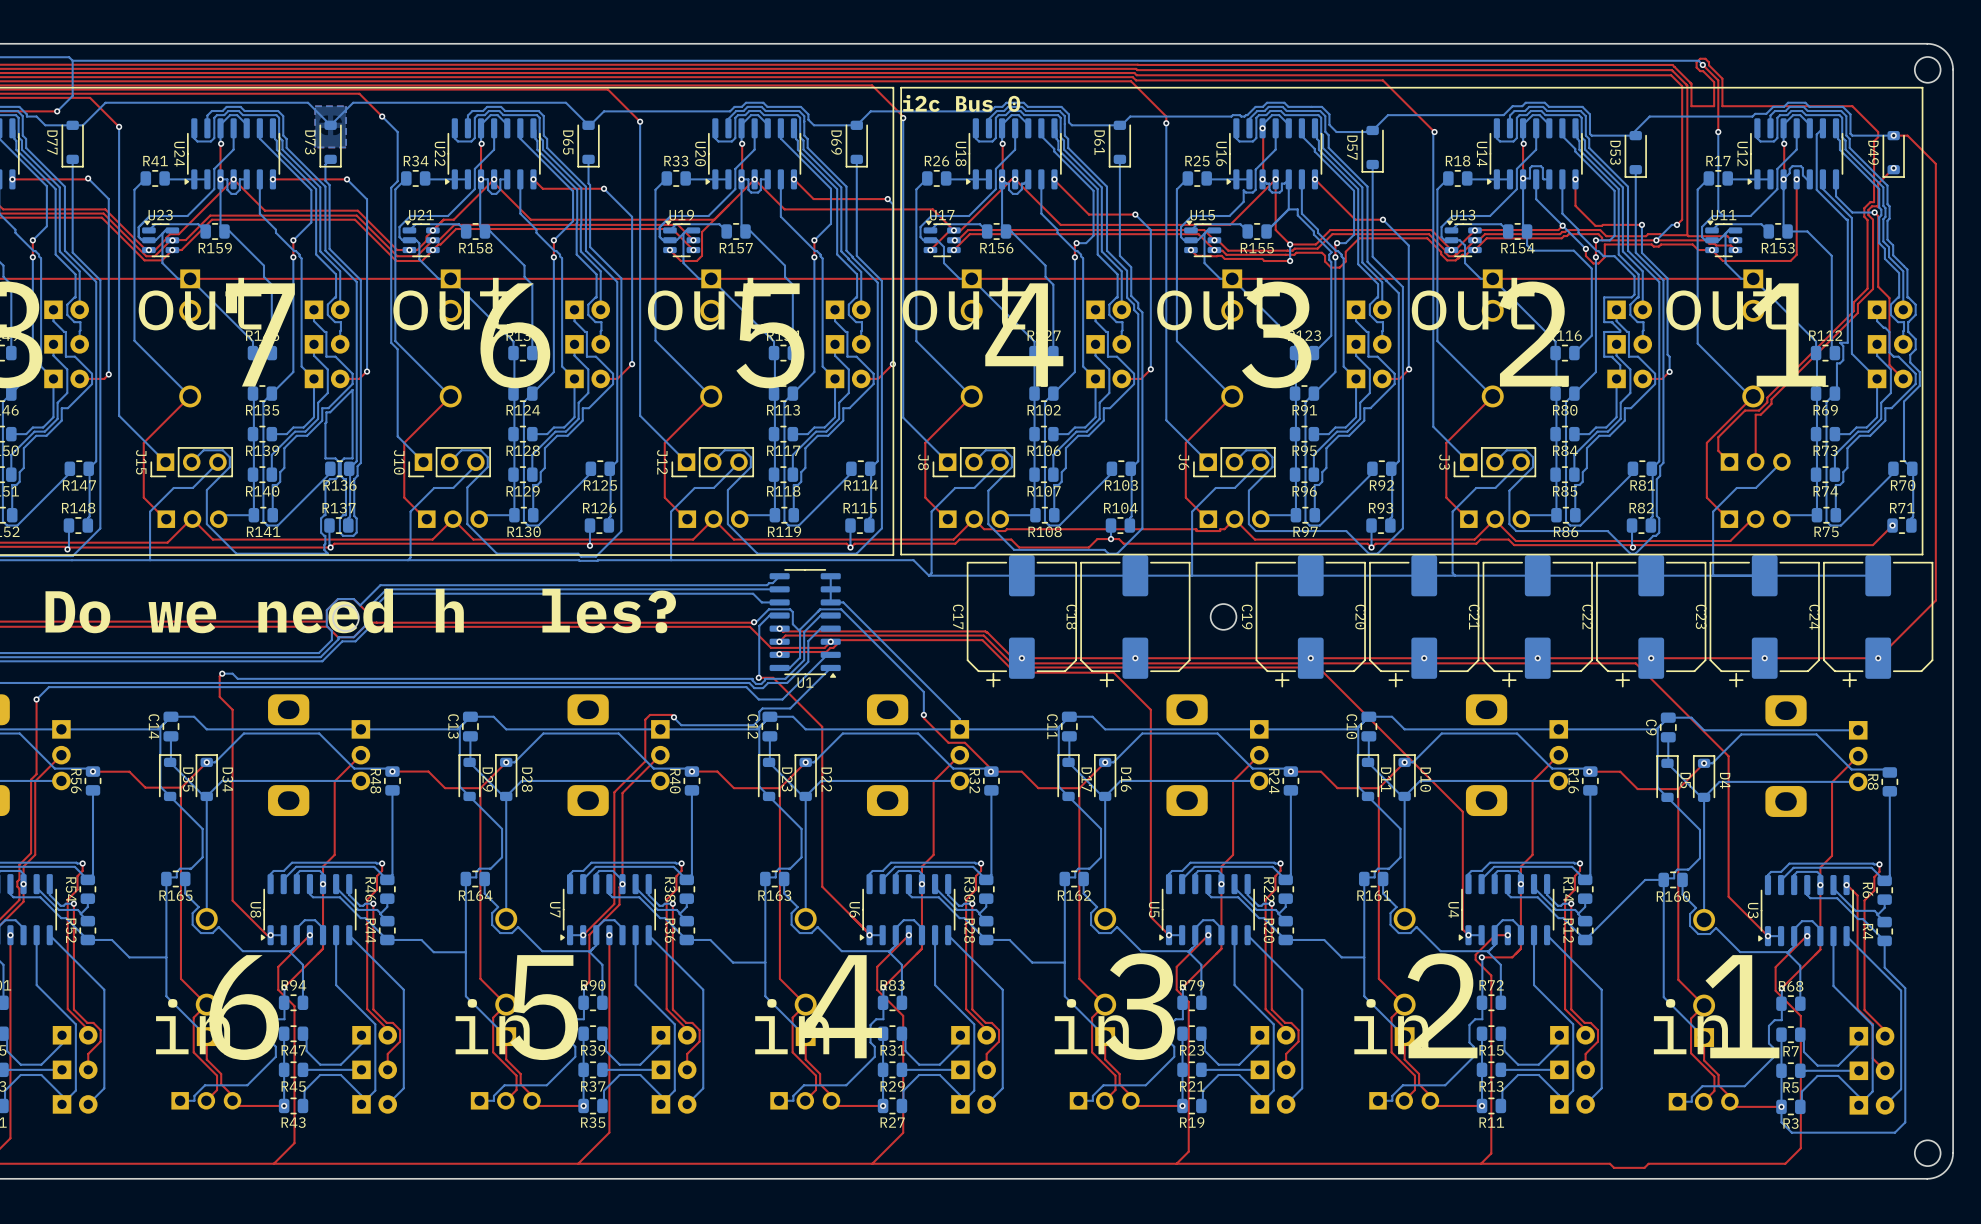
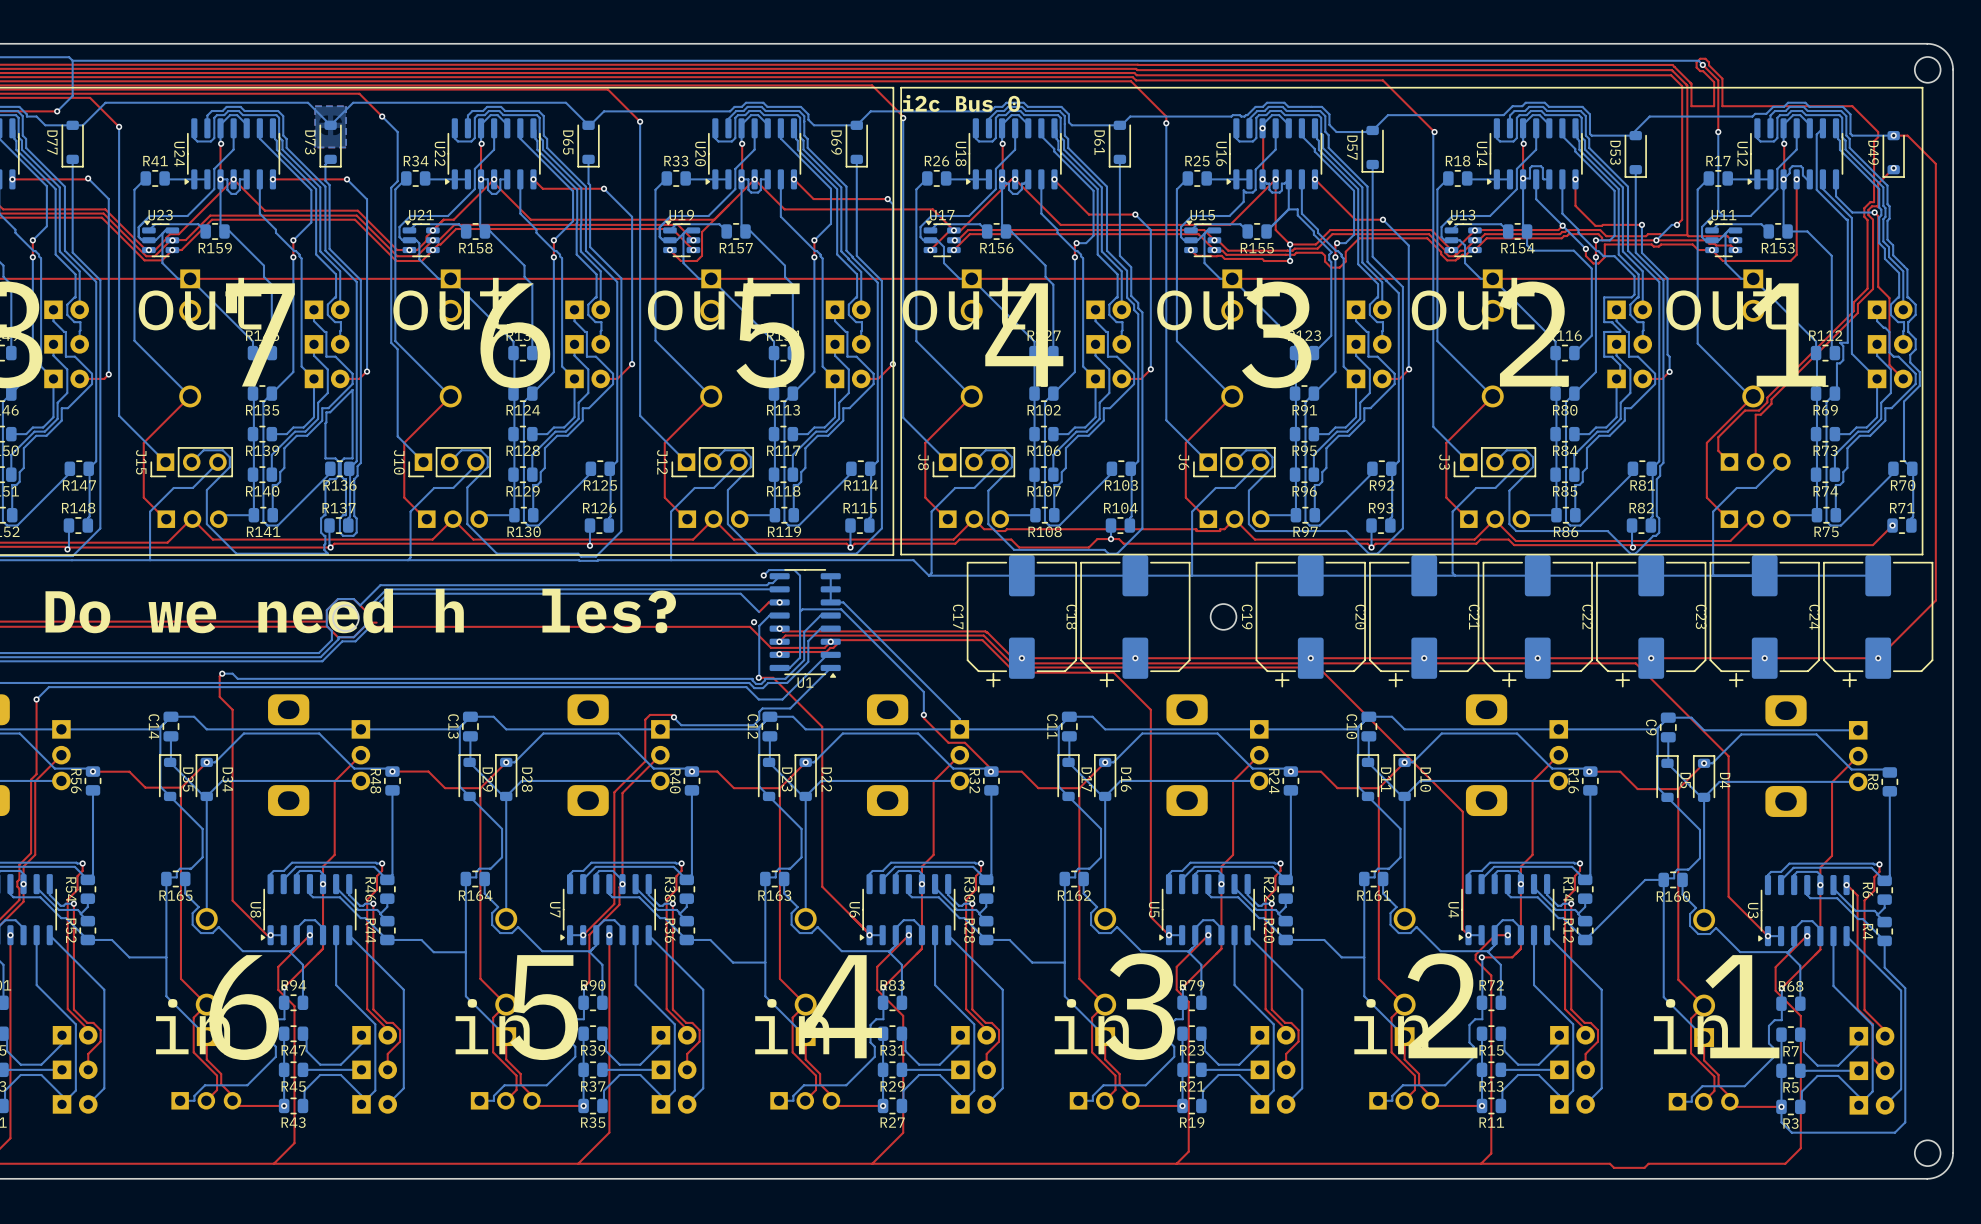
bottom track: none -> (763, 575) (769, 570) (794, 570) (800, 575) (800, 629)
via: none -> (763, 575)
bottom track: (740, 593) (753, 593) (761, 602) (779, 602) -> (740, 593) (759, 612)
top track: none -> (779, 602) (768, 602) (759, 612)
via: none -> (779, 602)
bottom track: (820, 609) (800, 629) -> (820, 609) (802, 609) (800, 611)
top track: (754, 622) (376, 622) -> none
bottom track: (754, 622) (768, 609) (790, 609) (792, 612) (792, 624) (800, 631) -> none

